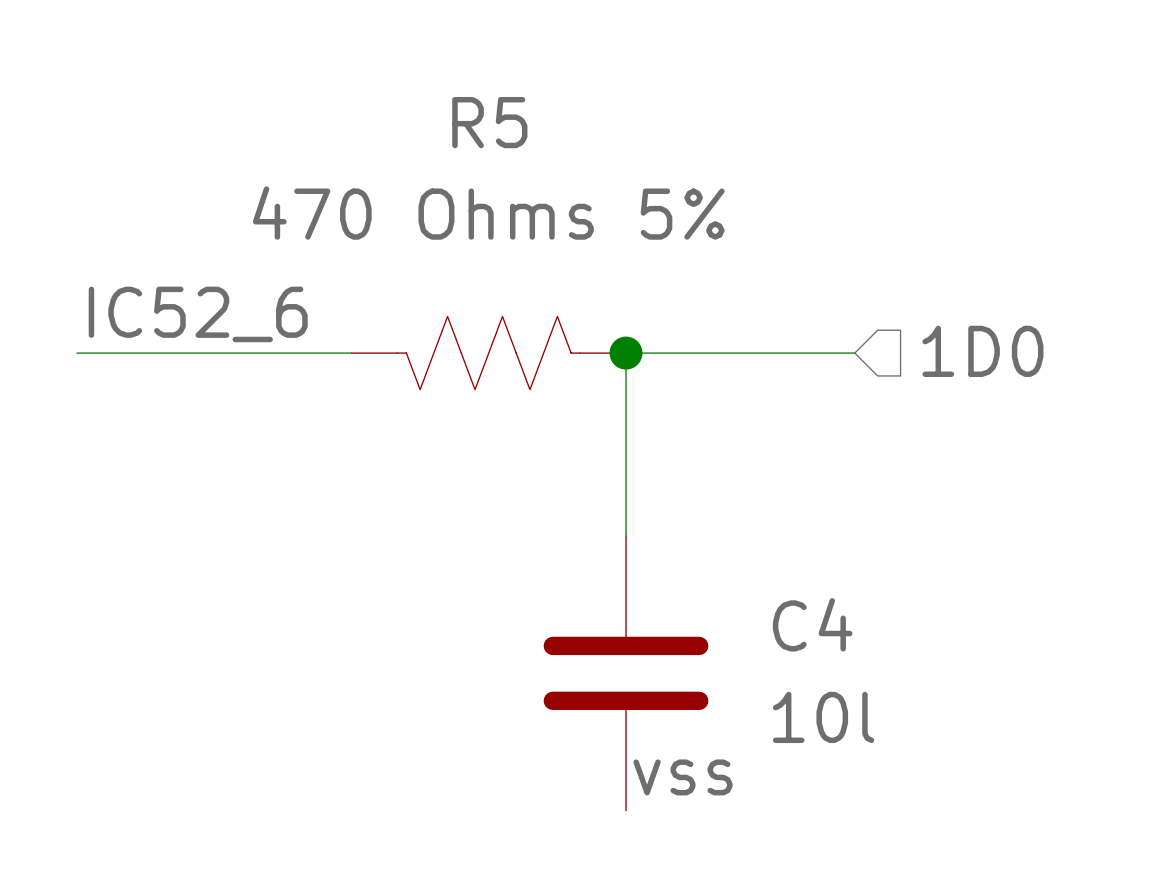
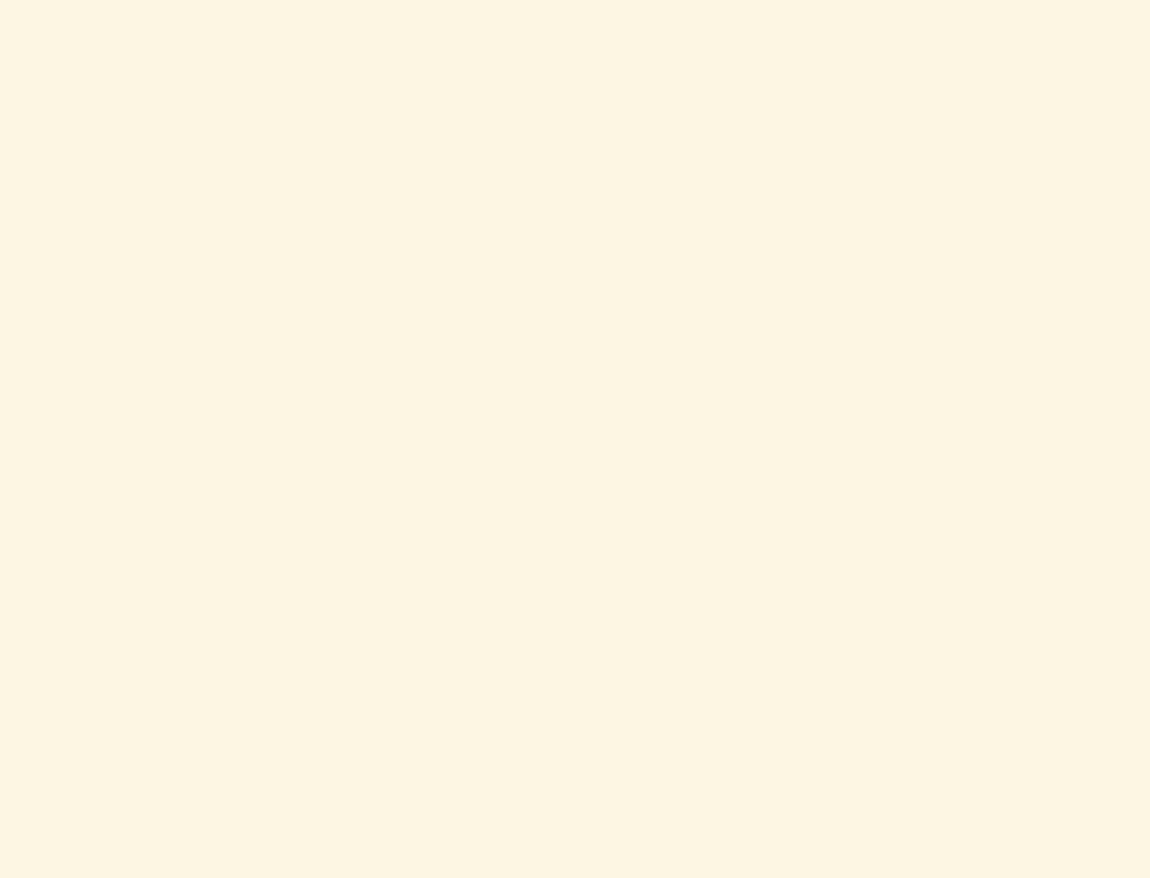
label: IC52_6 (198, 314) -> none
hierarchical label: 1D0 (982, 351) -> none
wire: (76, 353) (351, 353) -> none
R5: 470 Ohms 5% (488, 353) -> none
junction: (626, 353) -> none
wire: (854, 353) (626, 353) (626, 536) -> none
C4: 10l (626, 673) -> none
label: vss (683, 777) -> none

